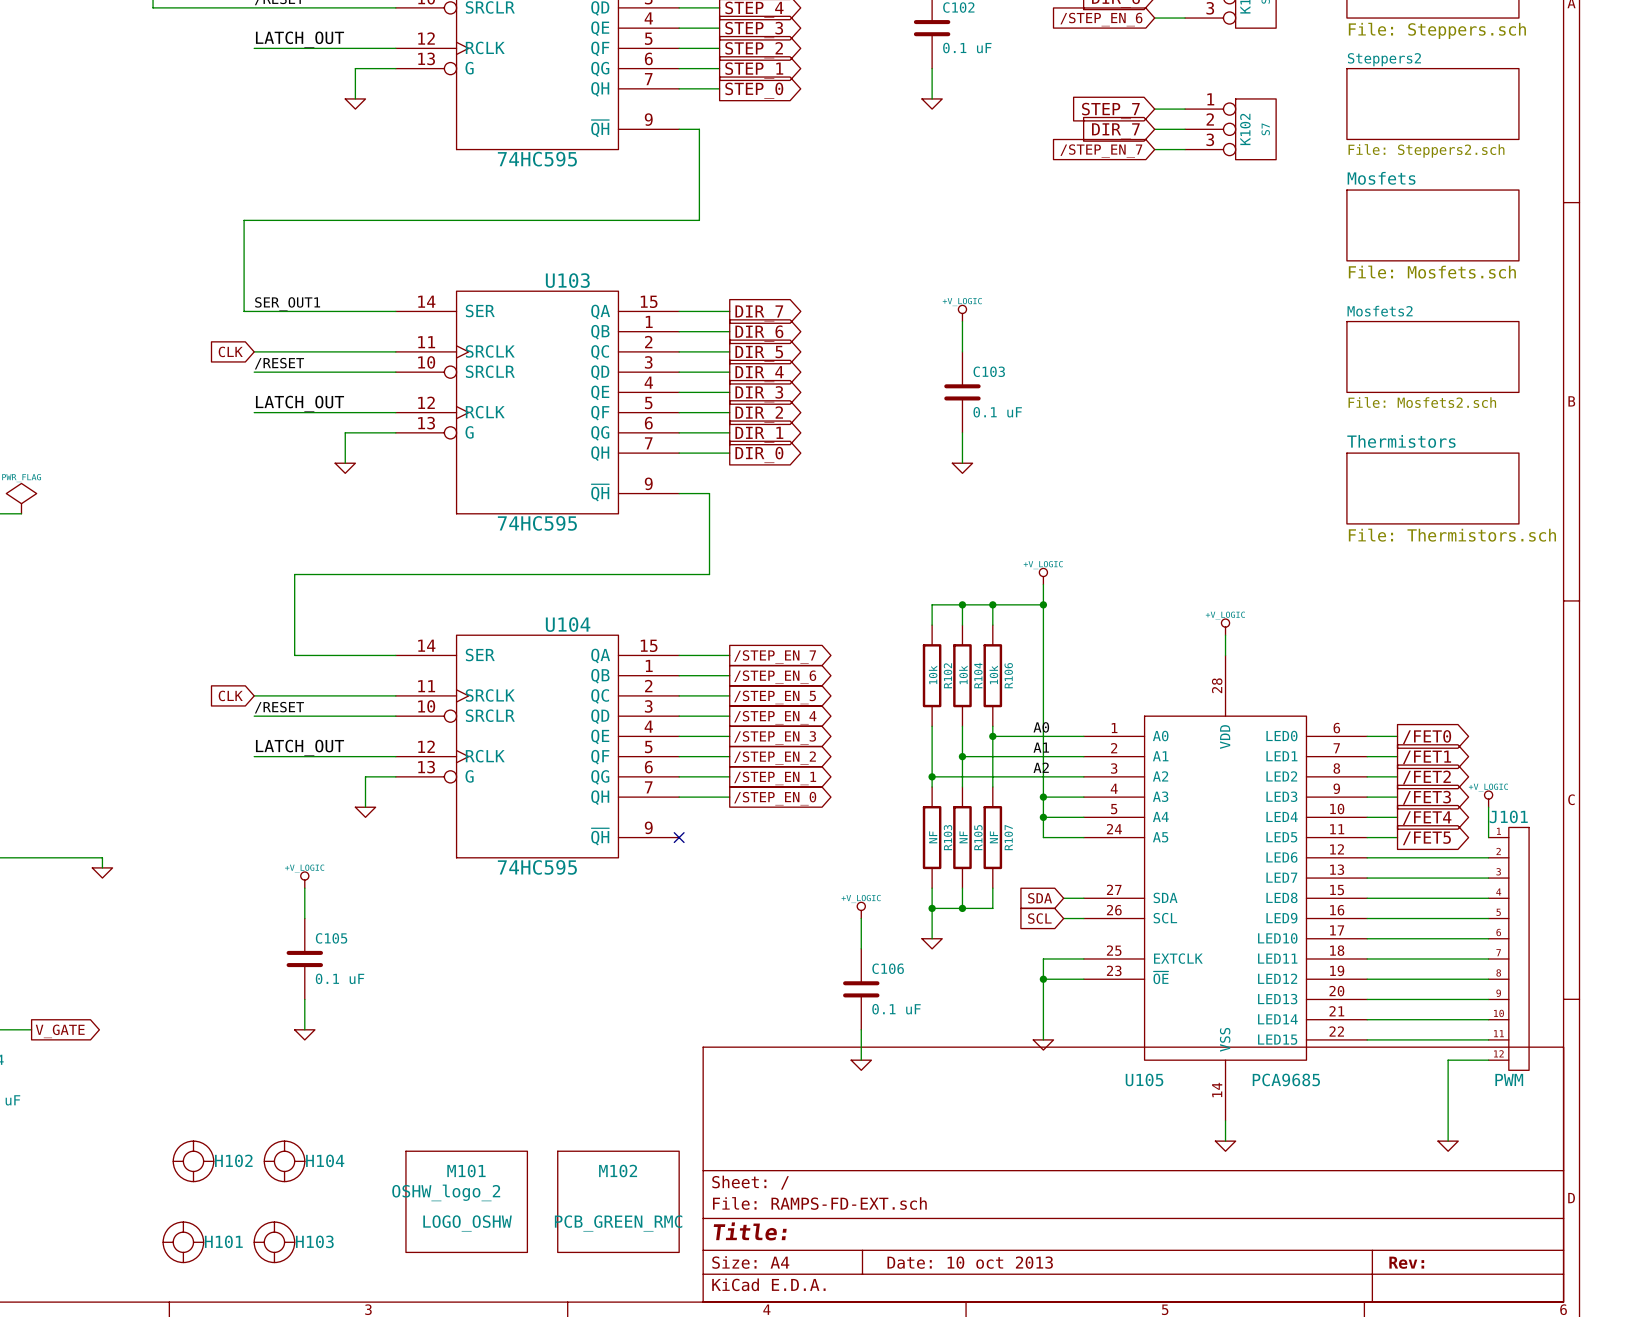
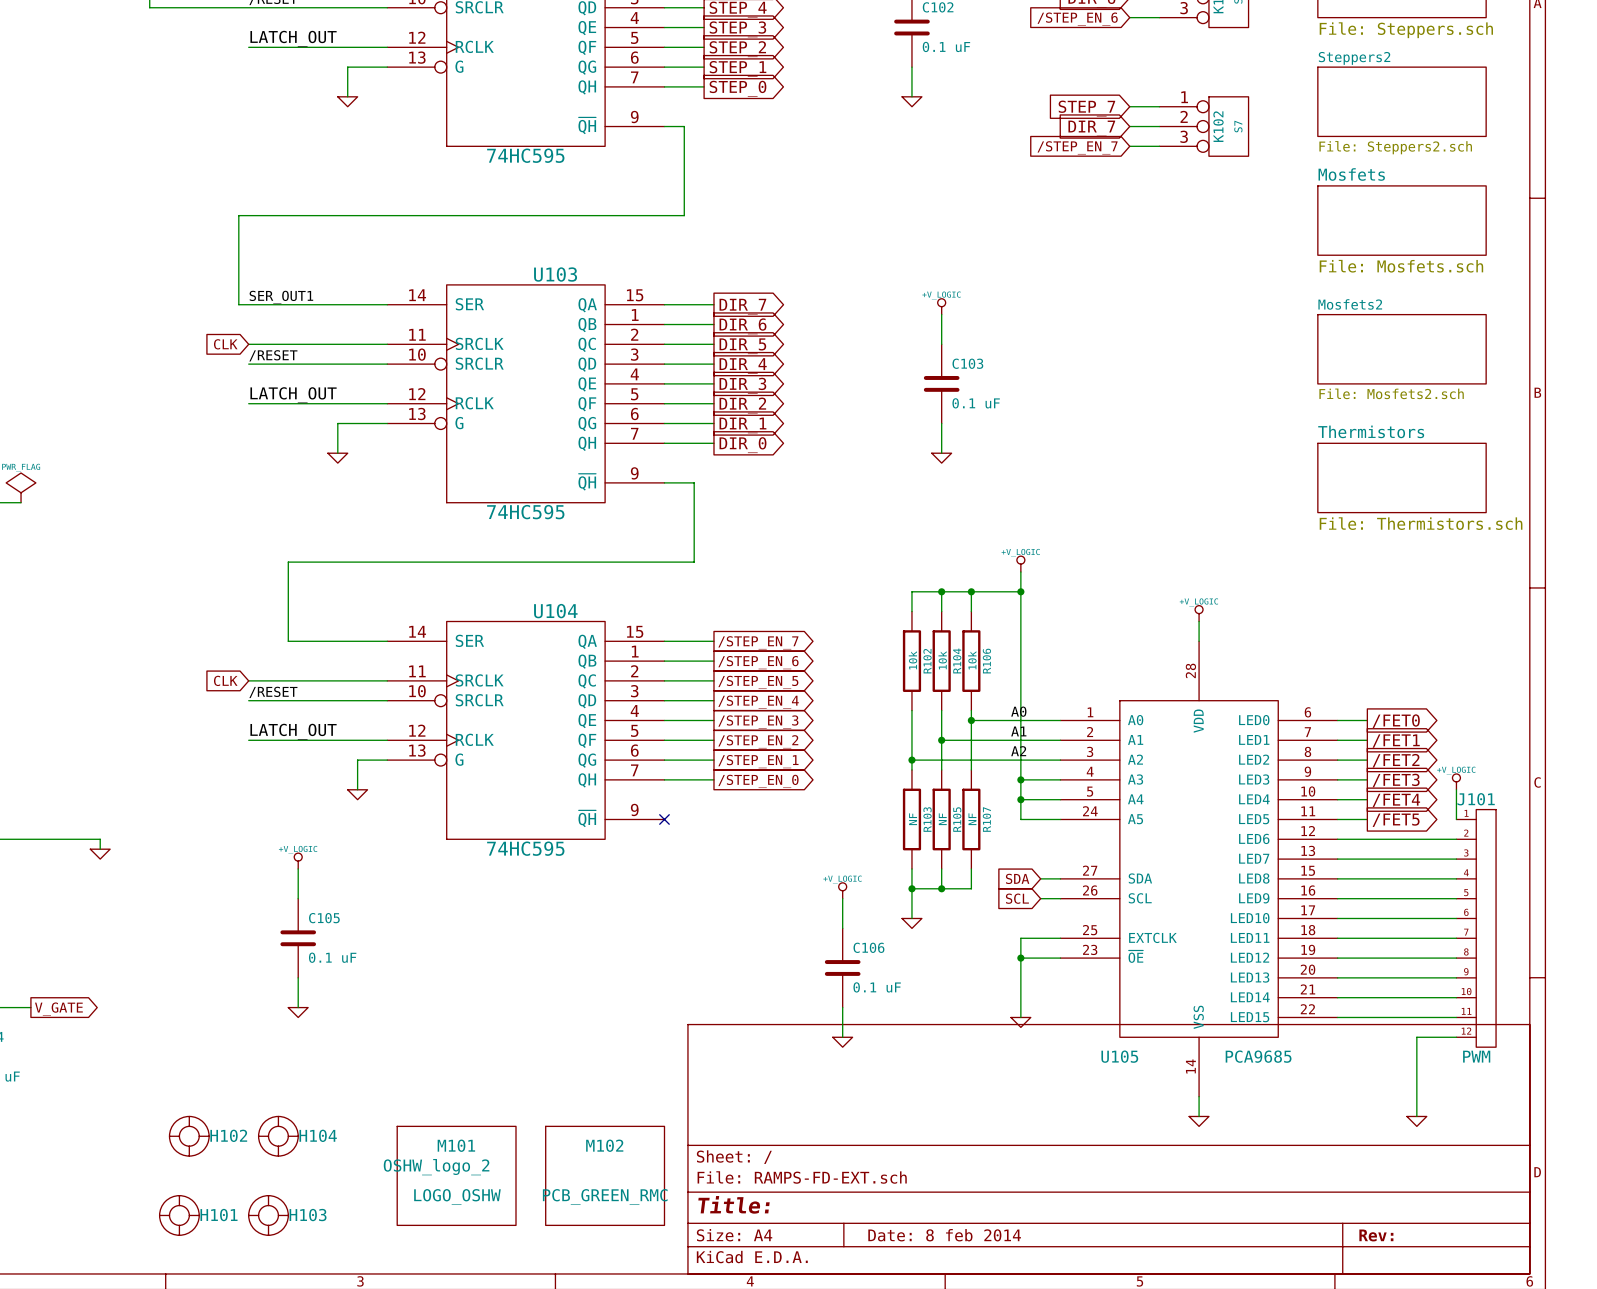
title block: Date: 10 oct 2013 (970, 1262) -> Date: 8 feb 2014 (944, 1235)

